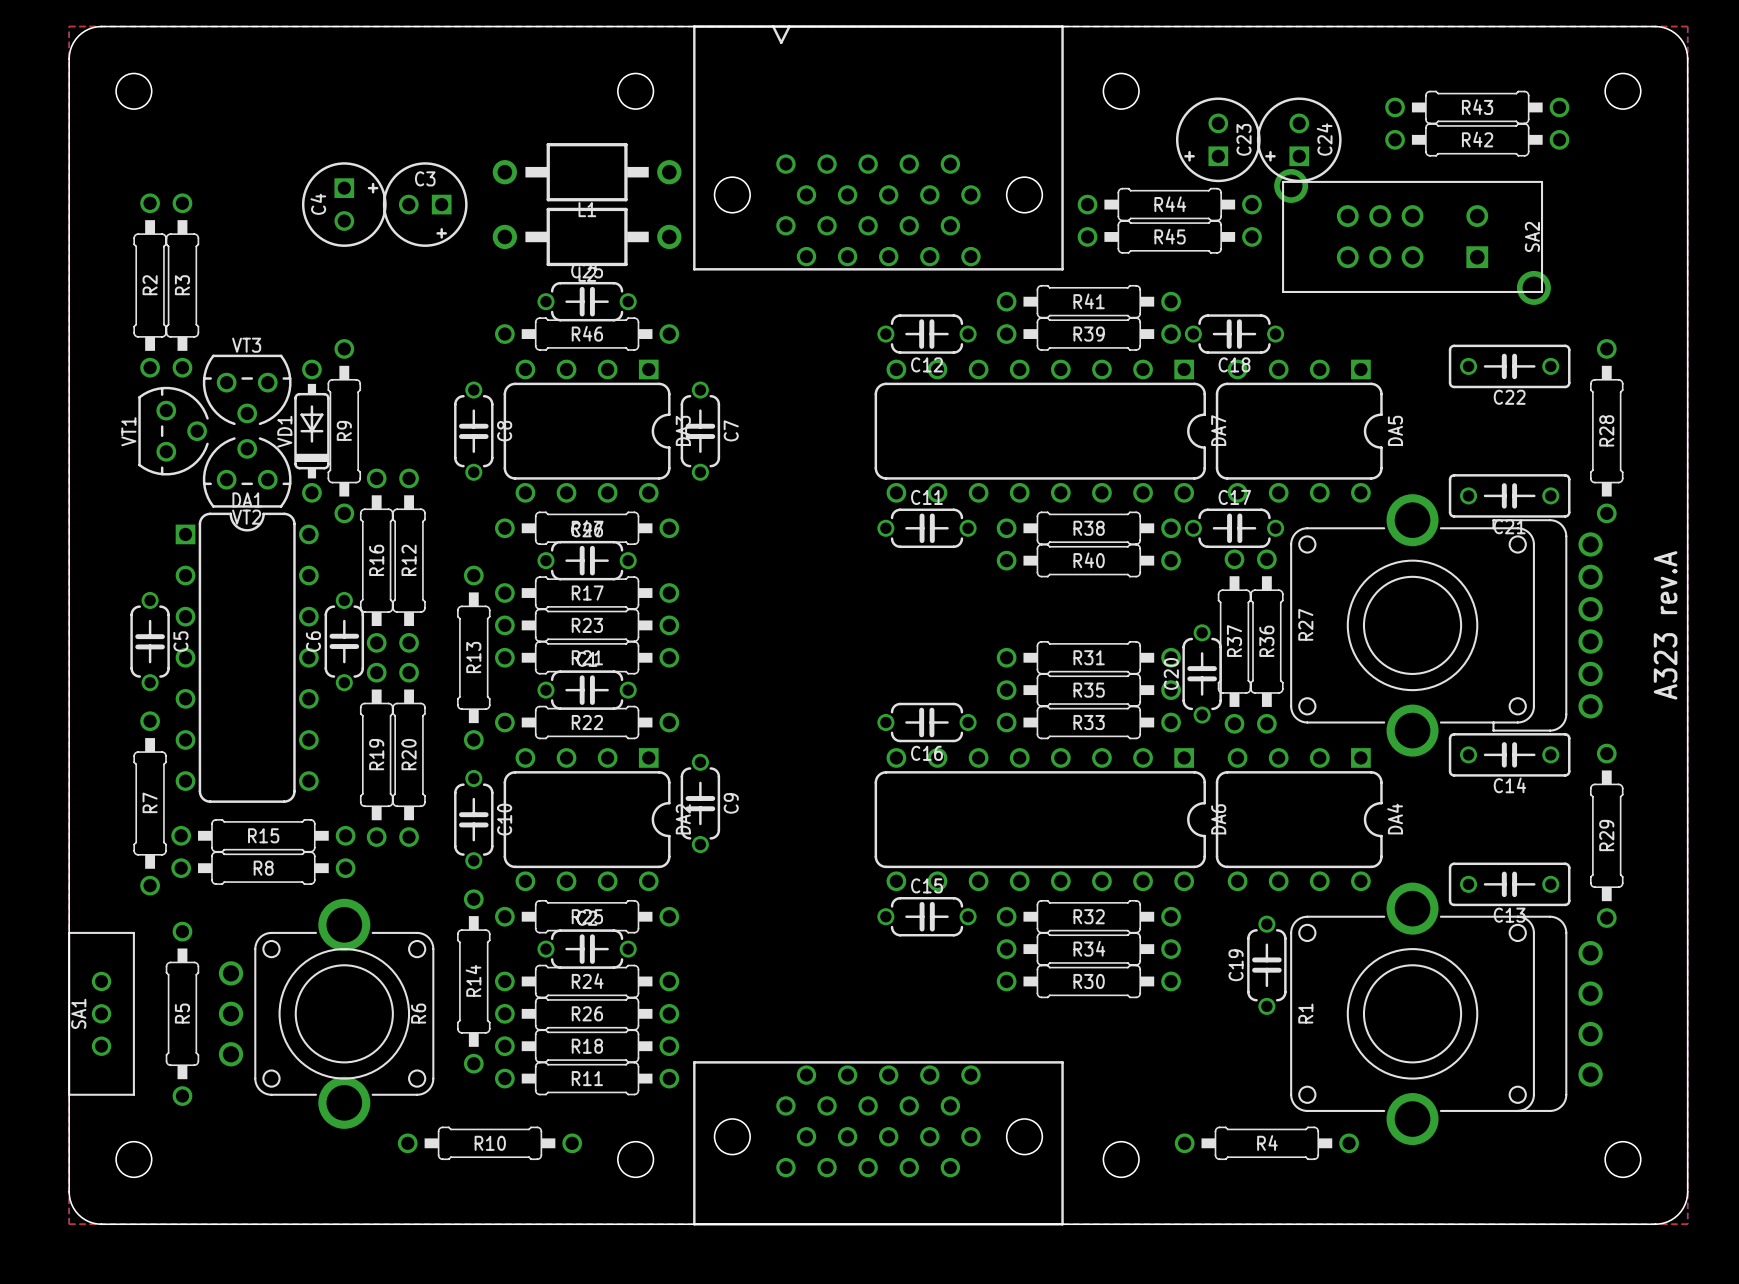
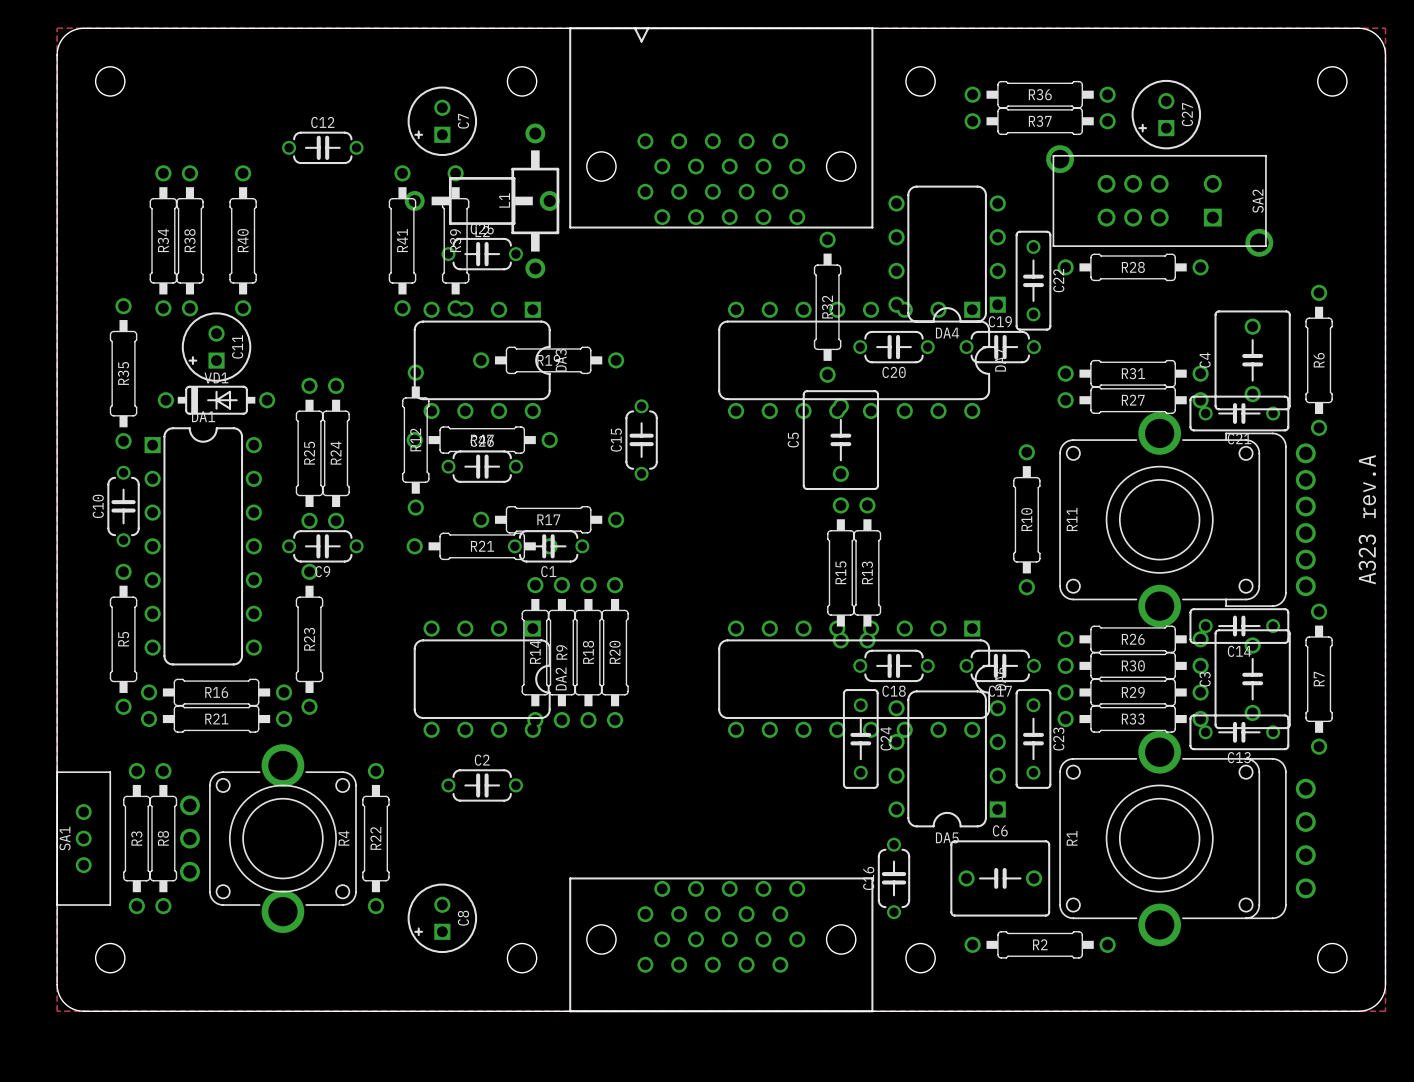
C23 footprint: [1175, 97, 1261, 183] -> [1015, 689, 1052, 789]
C24 footprint: [1256, 97, 1342, 183] -> [842, 689, 879, 789]
R43: (1477, 107) -> none
C27: none -> (1166, 114)
R42: (1477, 139) -> none
C4 footprint: [301, 162, 387, 247] -> [1214, 310, 1291, 411]
C3 footprint: [382, 162, 468, 247] -> [1214, 629, 1291, 730]
L1 rotation: 0° (587, 172) -> 90° clockwise (535, 200)
C3 name position: C3 (425, 178) -> C3 (1205, 679)
R44: (1169, 204) -> none
R45: (1169, 236) -> none
R2: (150, 285) -> none
R3 position: (182, 285) -> (136, 838)
R41 rotation: 0° (1088, 301) -> 90° clockwise (402, 240)
R41 position: (1088, 301) -> (402, 240)
R28: none -> (1133, 267)
R46: (587, 334) -> none
C12 rotation: 0° (926, 334) -> 180° (322, 147)
C12 position: (926, 334) -> (322, 147)
R39 rotation: 0° (1088, 334) -> 90° clockwise (455, 240)
R39 position: (1088, 334) -> (455, 240)
C18 position: (1234, 334) -> (894, 665)
C22 rotation: 0° (1509, 366) -> 90° counterclockwise (1033, 280)
C22 position: (1509, 366) -> (1033, 280)
C8 footprint: [454, 381, 494, 481] -> [407, 883, 478, 954]
C7 footprint: [680, 381, 721, 481] -> [407, 86, 478, 157]
VT3: (247, 389) -> none
R28 name: R28 (1606, 430) -> R6 (1319, 360)
VT1: (173, 431) -> none
VD1 rotation: 0° (311, 431) -> 90° clockwise (216, 400)
R9 position: (344, 431) -> (561, 652)
DA5 rotation: 0° (1299, 431) -> 90° clockwise (947, 758)
DA5 position: (1299, 431) -> (947, 758)
VT2: (247, 472) -> none
R27: none -> (1133, 400)
C11 name position: C11 (926, 497) -> C11 (237, 346)
C11 footprint: [877, 508, 977, 549] -> [181, 312, 252, 382]
R38 rotation: 0° (1088, 528) -> 90° clockwise (189, 240)
R38 position: (1088, 528) -> (189, 240)
C17 rotation: 0° (1234, 528) -> 180° (1000, 665)
C17 position: (1234, 528) -> (1000, 665)
R16: (376, 560) -> none
R12 position: (409, 560) -> (415, 440)
R40 rotation: 0° (1088, 560) -> 90° clockwise (243, 240)
R40 position: (1088, 560) -> (243, 240)
C5 footprint: [130, 591, 170, 692] -> [802, 390, 879, 491]
C6 footprint: [324, 591, 365, 692] -> [950, 840, 1051, 917]
R17 position: (587, 593) -> (548, 519)
R27 name: R27 (1305, 624) -> R11 (1072, 519)
R23 rotation: 0° (587, 625) -> 90° clockwise (309, 639)
R23 position: (587, 625) -> (309, 639)
C5 name position: C5 (180, 641) -> C5 (793, 440)
C6 name position: C6 (313, 641) -> C6 (1000, 830)
R37 rotation: 0° (1234, 641) -> 90° clockwise (1040, 121)
R37 position: (1234, 641) -> (1040, 121)
R36 rotation: 0° (1266, 641) -> 90° clockwise (1040, 94)
R36 position: (1266, 641) -> (1040, 94)
R13 position: (473, 657) -> (867, 572)
R31 position: (1088, 657) -> (1133, 373)
C20 rotation: 0° (1202, 673) -> 90° counterclockwise (894, 347)
C20 position: (1202, 673) -> (894, 347)
C1 rotation: 0° (587, 690) -> 180° (548, 546)
C1 position: (587, 690) -> (548, 546)
R15: none -> (840, 572)
R35 rotation: 0° (1088, 690) -> 90° clockwise (123, 373)
R35 position: (1088, 690) -> (123, 373)
R22 rotation: 0° (587, 722) -> 90° clockwise (375, 838)
R22 position: (587, 722) -> (375, 838)
C16 rotation: 0° (926, 722) -> 90° clockwise (894, 878)
C16 position: (926, 722) -> (894, 878)
R33 position: (1088, 722) -> (1133, 719)
R19 rotation: 0° (376, 754) -> 90° clockwise (548, 360)
R19 position: (376, 754) -> (548, 360)
R20 position: (409, 754) -> (615, 652)
R7 position: (150, 803) -> (1319, 679)
C9 rotation: 0° (700, 803) -> 90° clockwise (322, 546)
C9 position: (700, 803) -> (322, 546)
C10 rotation: 0° (473, 819) -> 180° (123, 506)
C10 position: (473, 819) -> (123, 506)
DA4 rotation: 0° (1299, 819) -> 90° clockwise (947, 254)
DA4 position: (1299, 819) -> (947, 254)
R15 name: R15 (263, 835) -> R16 (216, 692)
R29 rotation: 0° (1606, 835) -> 90° clockwise (1133, 692)
R29 position: (1606, 835) -> (1133, 692)
R8 name: R8 (263, 868) -> R21 (216, 718)
R25 rotation: 0° (587, 916) -> 90° clockwise (309, 453)
R25 position: (587, 916) -> (309, 453)
C15 rotation: 0° (926, 916) -> 90° counterclockwise (641, 440)
C15 position: (926, 916) -> (641, 440)
R32 rotation: 0° (1088, 916) -> 90° clockwise (827, 307)
R32 position: (1088, 916) -> (827, 307)
R34 rotation: 0° (1088, 949) -> 90° clockwise (163, 240)
R34 position: (1088, 949) -> (163, 240)
C19 rotation: 0° (1266, 965) -> 90° clockwise (1000, 347)
C19 position: (1266, 965) -> (1000, 347)
R14 position: (473, 981) -> (535, 652)
R24 rotation: 0° (587, 981) -> 90° clockwise (336, 453)
R24 position: (587, 981) -> (336, 453)
R30 position: (1088, 981) -> (1133, 665)
R5 position: (182, 1013) -> (123, 639)
R8: none -> (163, 838)
R6 name: R6 (418, 1013) -> R4 (343, 838)
R26 position: (587, 1013) -> (1133, 639)
R18 rotation: 0° (587, 1046) -> 90° clockwise (588, 652)
R18 position: (587, 1046) -> (588, 652)
R11: (587, 1078) -> none
R10 rotation: 0° (489, 1143) -> 90° clockwise (1026, 519)
R10 position: (489, 1143) -> (1026, 519)
R4 name: R4 (1267, 1143) -> R2 (1040, 944)

